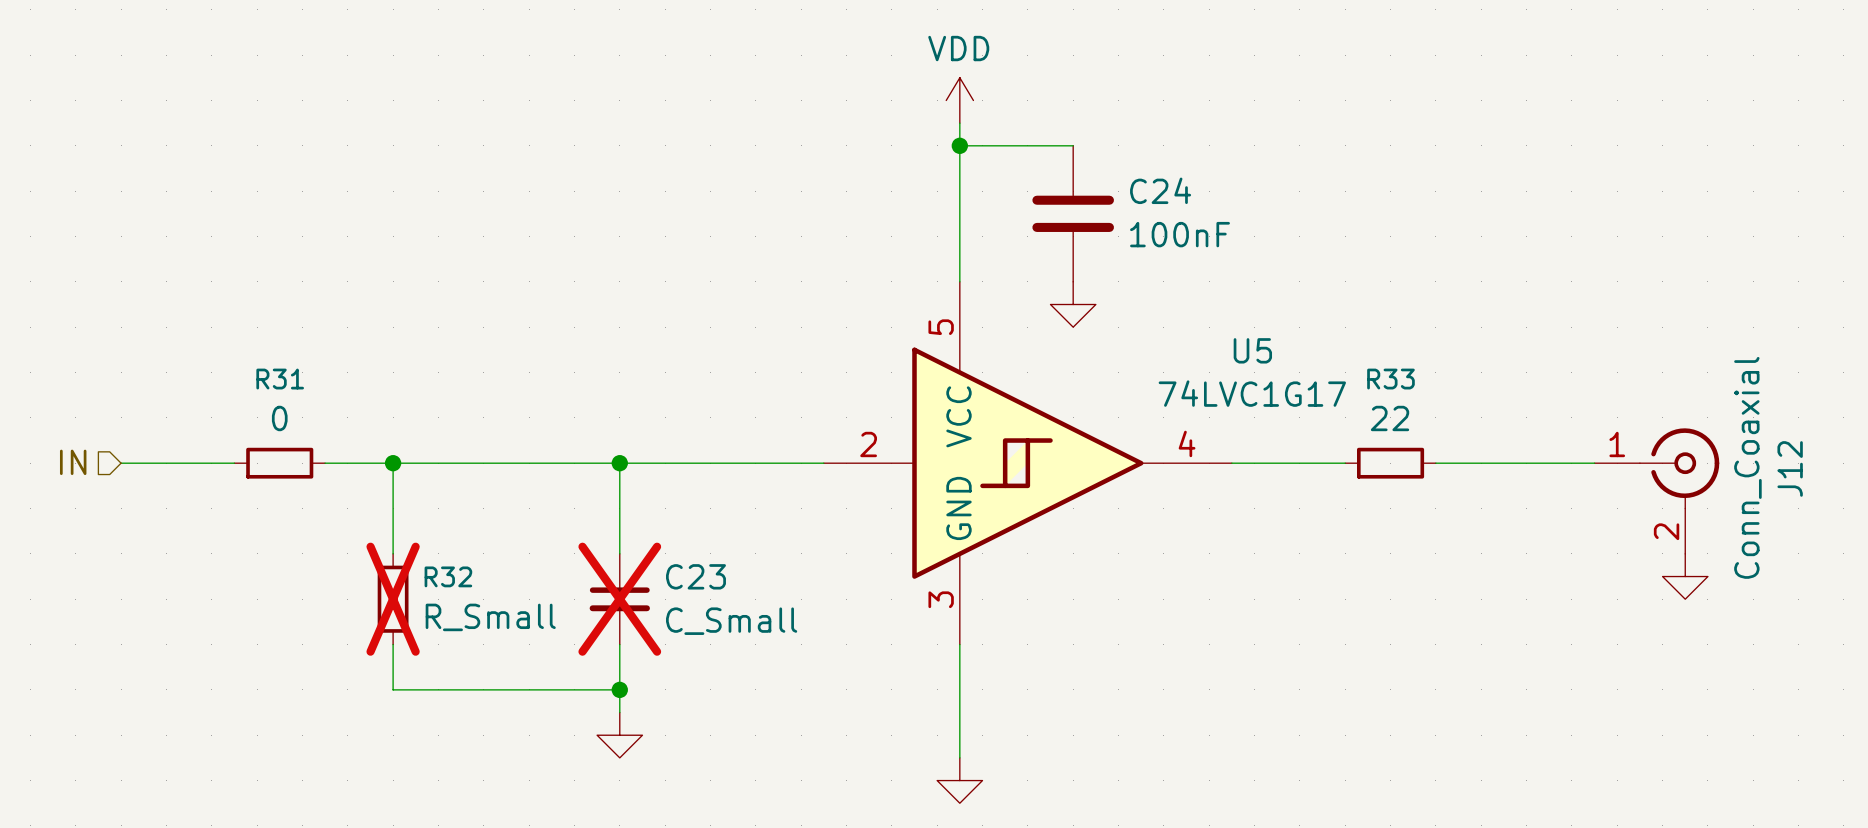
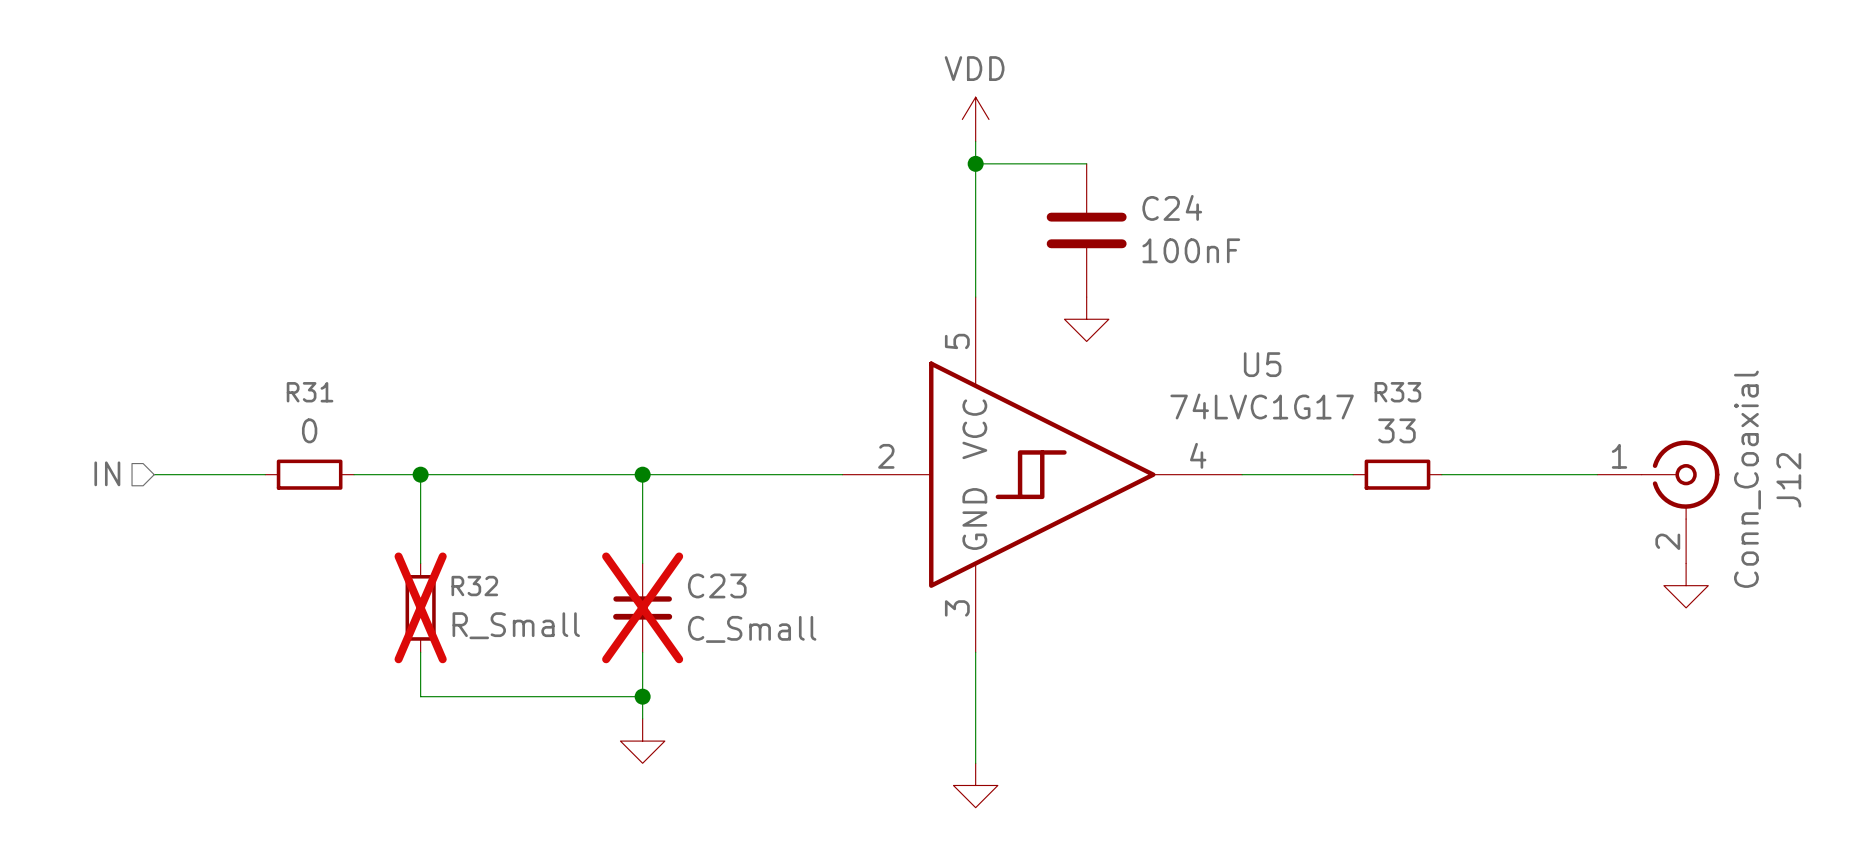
R33 value: 22 (1390, 418) -> 33 (1396, 430)

